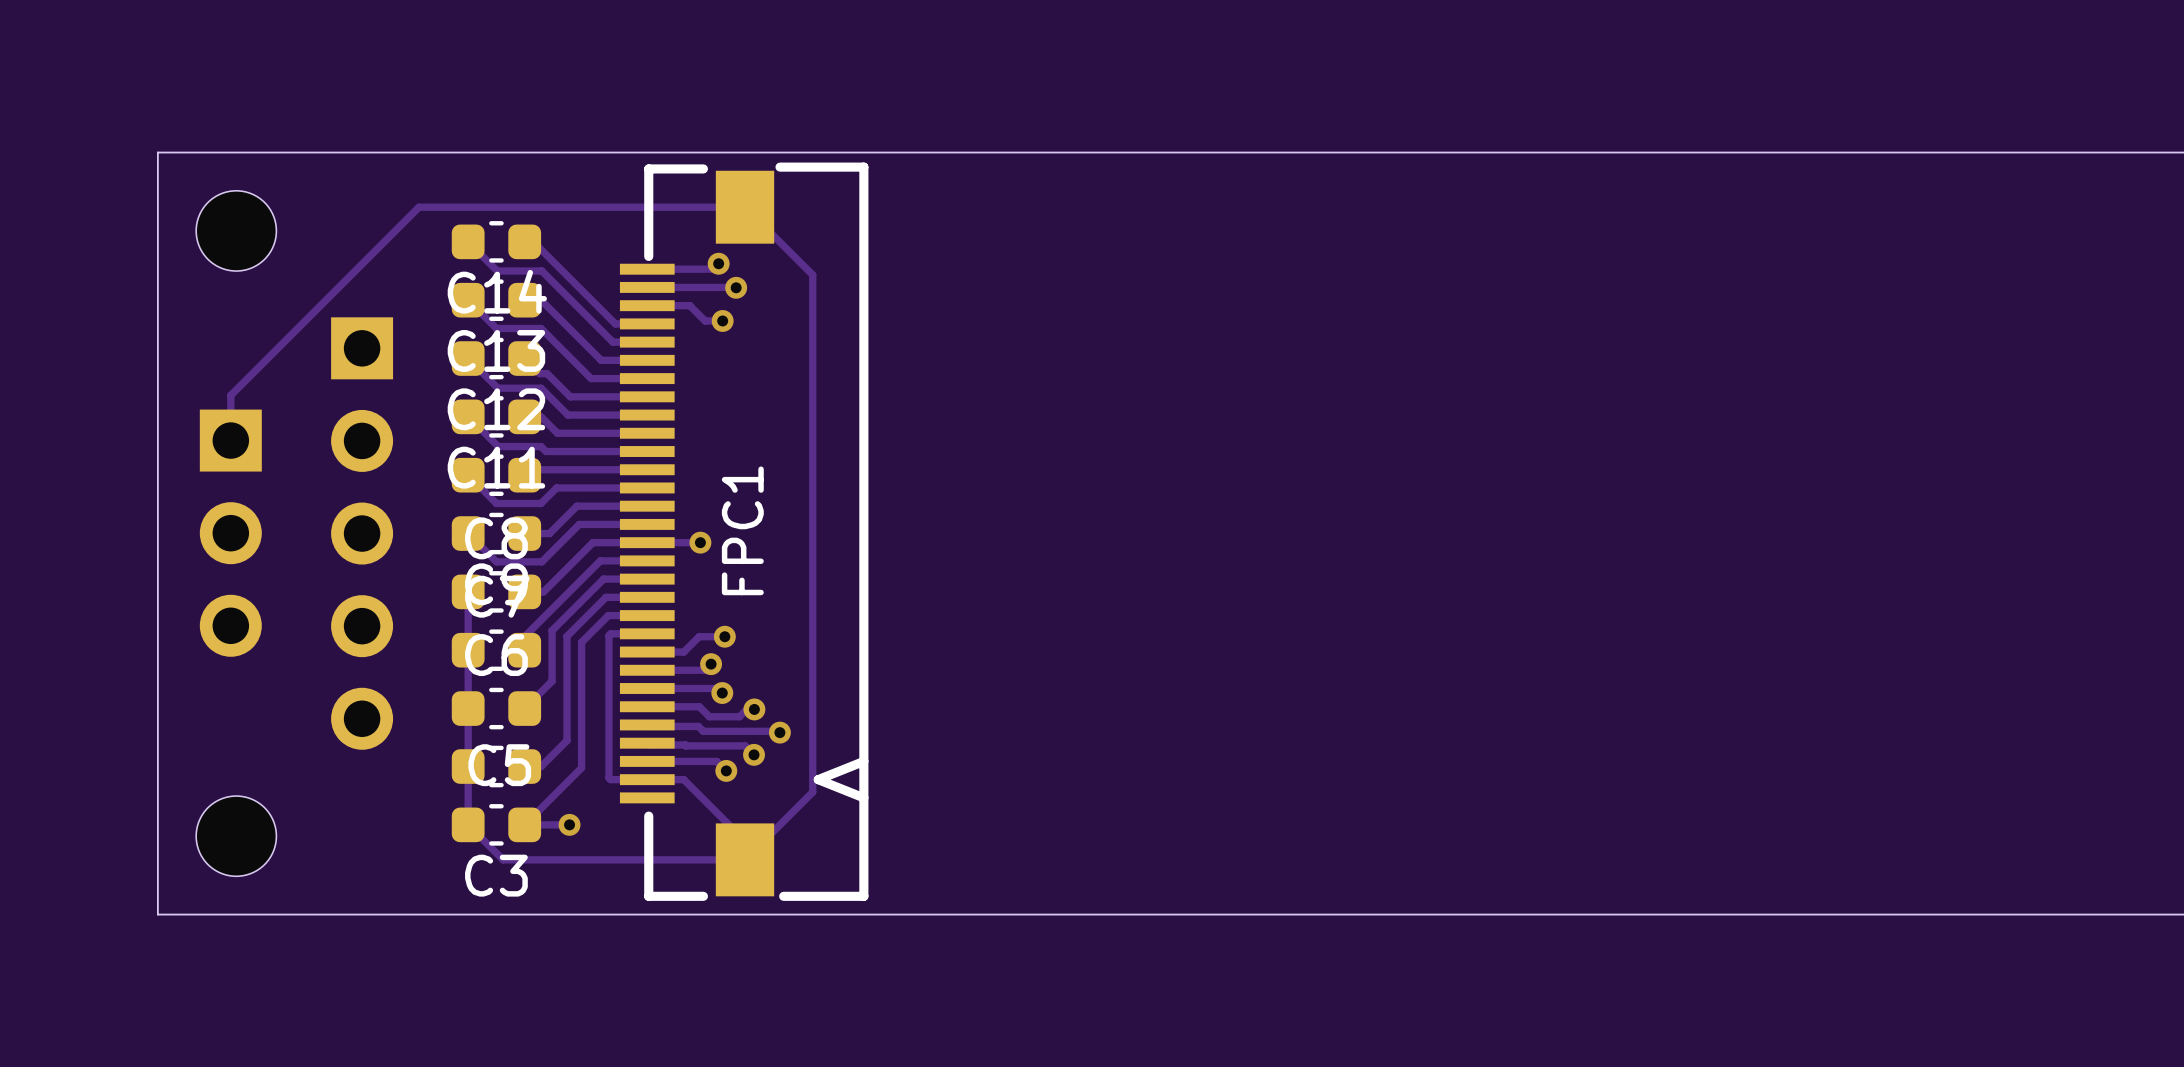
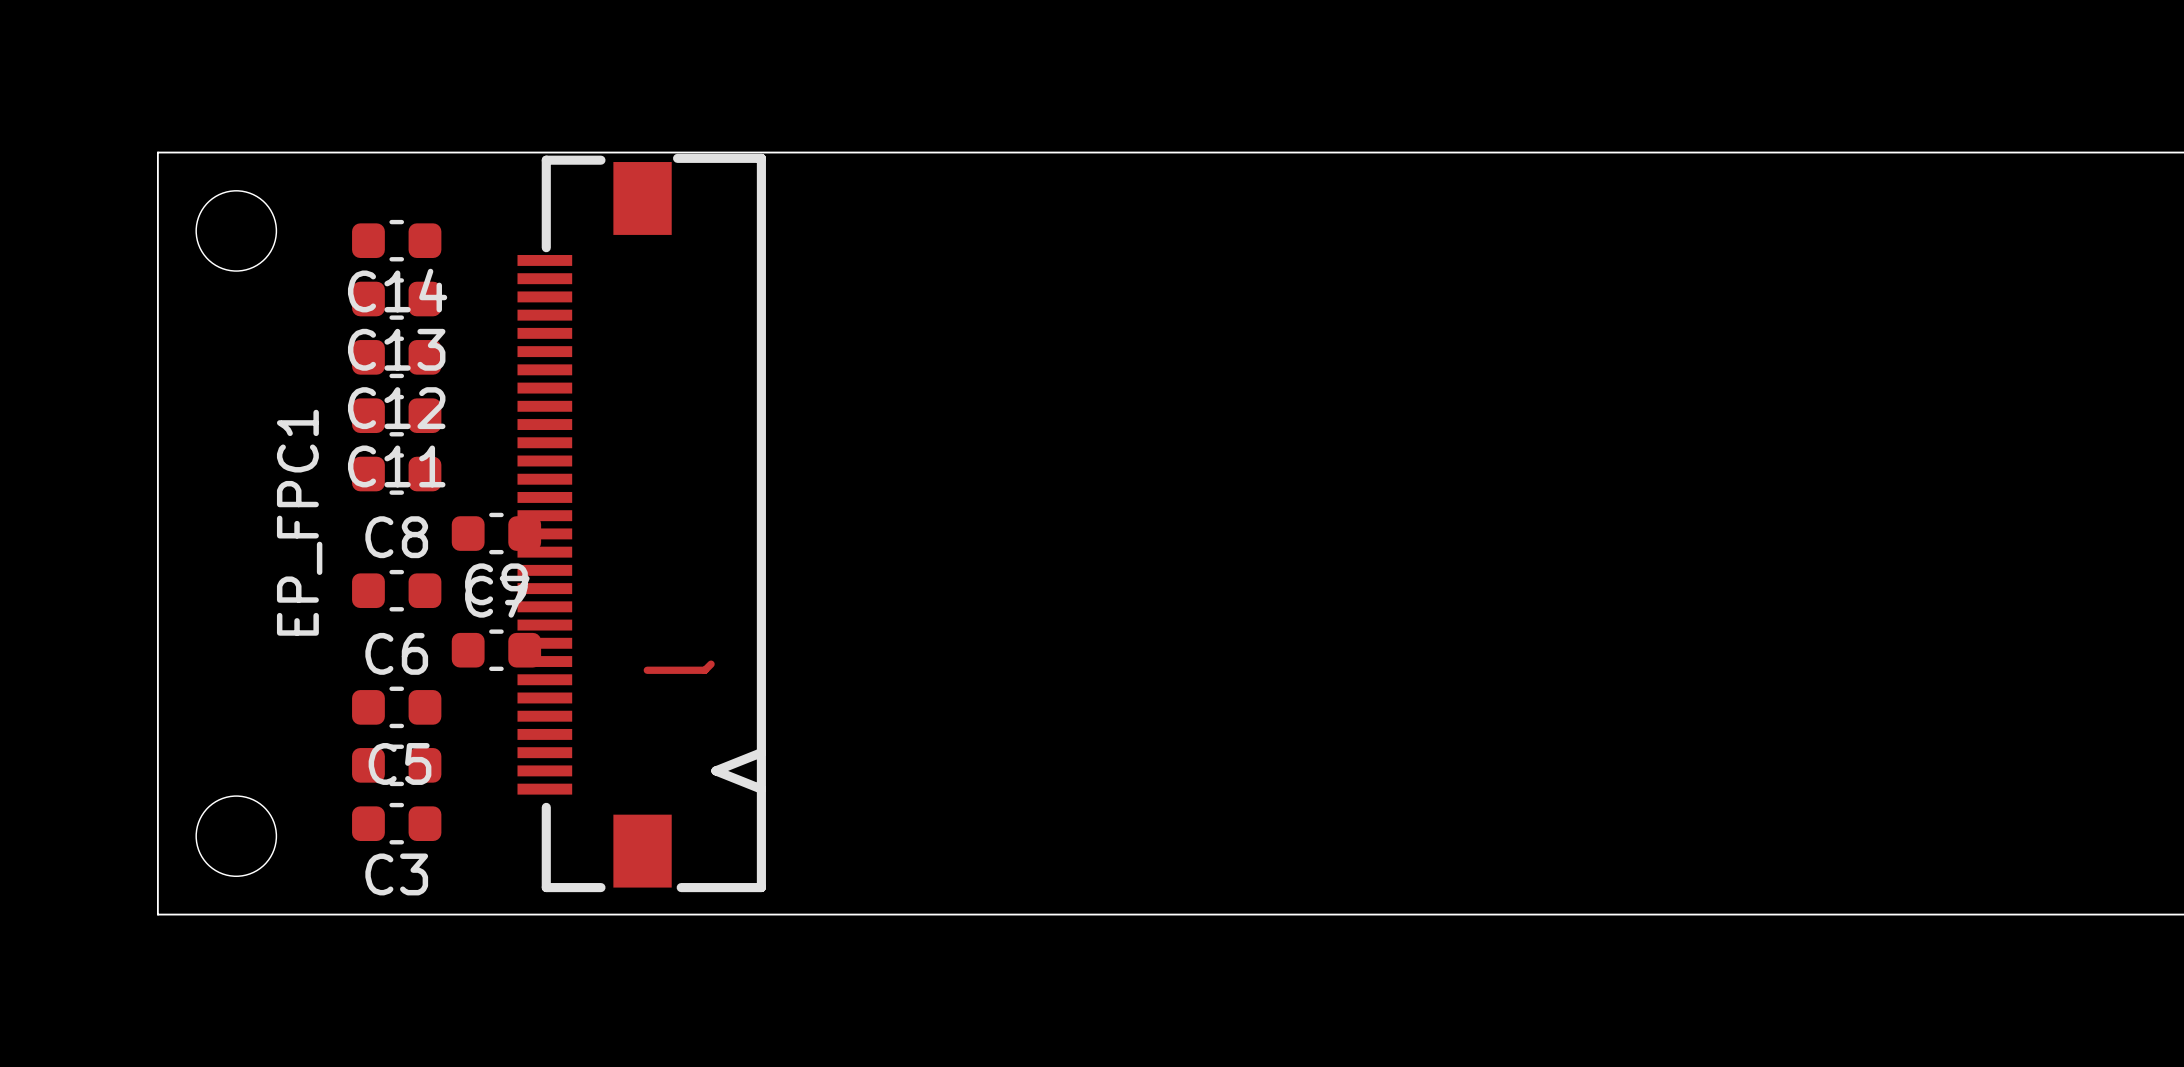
track: (468, 241) (497, 270) (541, 270) (612, 342) (647, 342) -> none
C14 position: (496, 241) -> (396, 240)
track: (524, 241) (533, 241) (615, 323) (647, 323) -> none
track: (718, 263) (713, 269) (647, 269) -> none
via: (718, 263) -> none
track: (647, 287) (735, 287) -> none
via: (736, 287) -> none
track: (468, 300) (496, 328) (541, 328) (591, 378) (647, 378) -> none
C13 position: (496, 300) -> (396, 299)
track: (524, 300) (541, 300) (601, 360) (647, 360) -> none
track: (647, 305) (689, 305) (705, 320) (722, 320) -> none
via: (722, 320) -> none
track: (468, 358) (497, 388) (541, 388) (567, 415) (647, 415) -> none
C12 position: (496, 358) -> (396, 357)
track: (524, 358) (539, 373) (547, 373) (570, 396) (647, 396) -> none
track: (468, 416) (498, 446) (541, 446) (546, 451) (647, 451) -> none
C11 position: (496, 416) -> (396, 415)
track: (524, 416) (541, 416) (557, 433) (647, 433) (645, 431) -> none
track: (230, 428) (230, 395) (418, 207) (745, 207) (812, 274) (812, 792) (745, 859) -> none
track: (647, 469) (530, 469) (524, 475) -> none
track: (468, 475) (496, 503) (541, 503) (556, 487) (647, 487) -> none
part position: (496, 475) -> (396, 474)
track: (647, 506) (576, 506) (549, 533) (524, 533) -> none
EP_FPC1: none -> (641, 522)
track: (647, 524) (579, 524) (541, 561) (496, 561) (468, 533) -> none
FPC1: (744, 531) -> none
part: (230, 533) -> none
part: (362, 533) -> none
track: (700, 542) (592, 542) (543, 591) (524, 591) -> none
via: (700, 542) -> none
track: (647, 560) (600, 560) (524, 636) (524, 650) -> none
track: (647, 579) (603, 579) (552, 630) (552, 681) (524, 708) -> none
track: (468, 591) (468, 824) (503, 859) (745, 859) -> none
C8 position: (496, 591) -> (396, 590)
track: (647, 597) (605, 597) (566, 636) (566, 740) (541, 766) (524, 766) -> none
track: (647, 615) (608, 615) (581, 642) (581, 767) (524, 824) (569, 824) -> none
track: (647, 633) (610, 633) (608, 635) (608, 777) (610, 779) (683, 779) (745, 840) (745, 859) -> none
track: (724, 636) (699, 636) (683, 652) (647, 652) -> none
via: (724, 636) -> none
via: (711, 664) -> none
track: (647, 688) (717, 688) (722, 693) -> none
via: (722, 693) -> none
track: (647, 706) (699, 706) (709, 716) (739, 716) (746, 709) (754, 709) -> none
C6 position: (496, 708) -> (396, 707)
via: (754, 709) -> none
track: (647, 724) (698, 726) (703, 731) (779, 732) -> none
via: (779, 732) -> none
track: (647, 743) (649, 744) (745, 745) (754, 754) -> none
via: (754, 754) -> none
track: (647, 761) (716, 761) (726, 770) -> none
C5 position: (496, 766) -> (396, 765)
via: (726, 770) -> none
C3 position: (496, 824) -> (396, 823)
via: (569, 824) -> none

